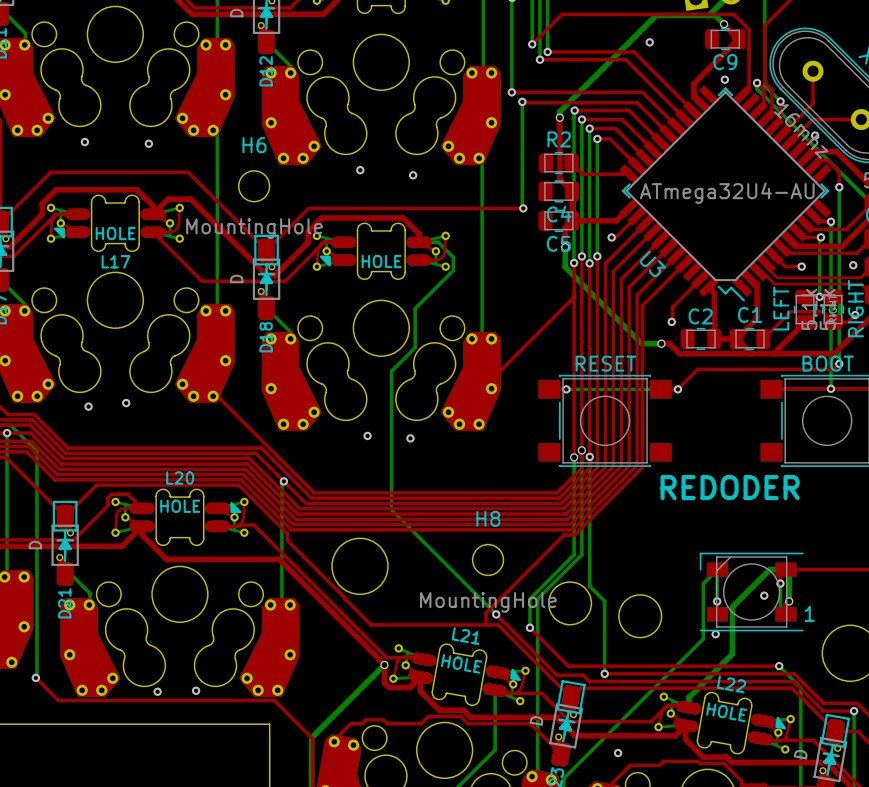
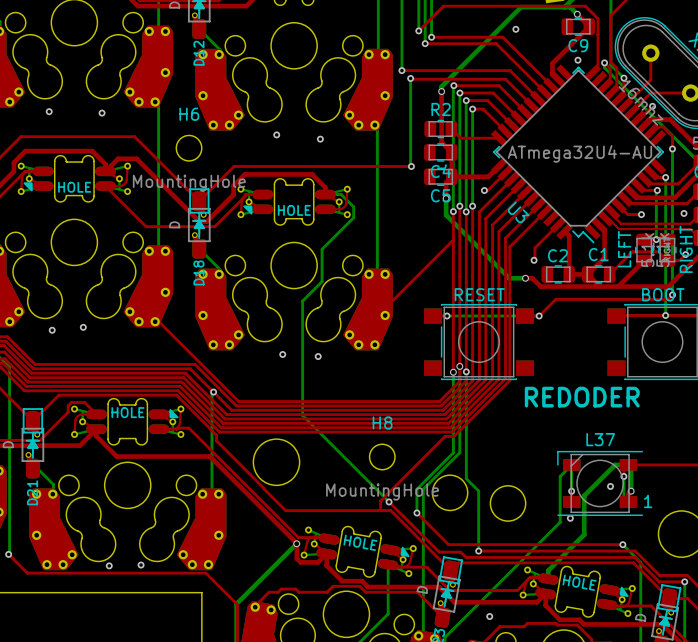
L17 name: L17 (115, 261) -> none
L20 name: L20 (180, 477) -> none
L37 name: none -> L37 (600, 439)
L21 name: L21 (465, 636) -> none
L22 name: L22 (731, 684) -> none

